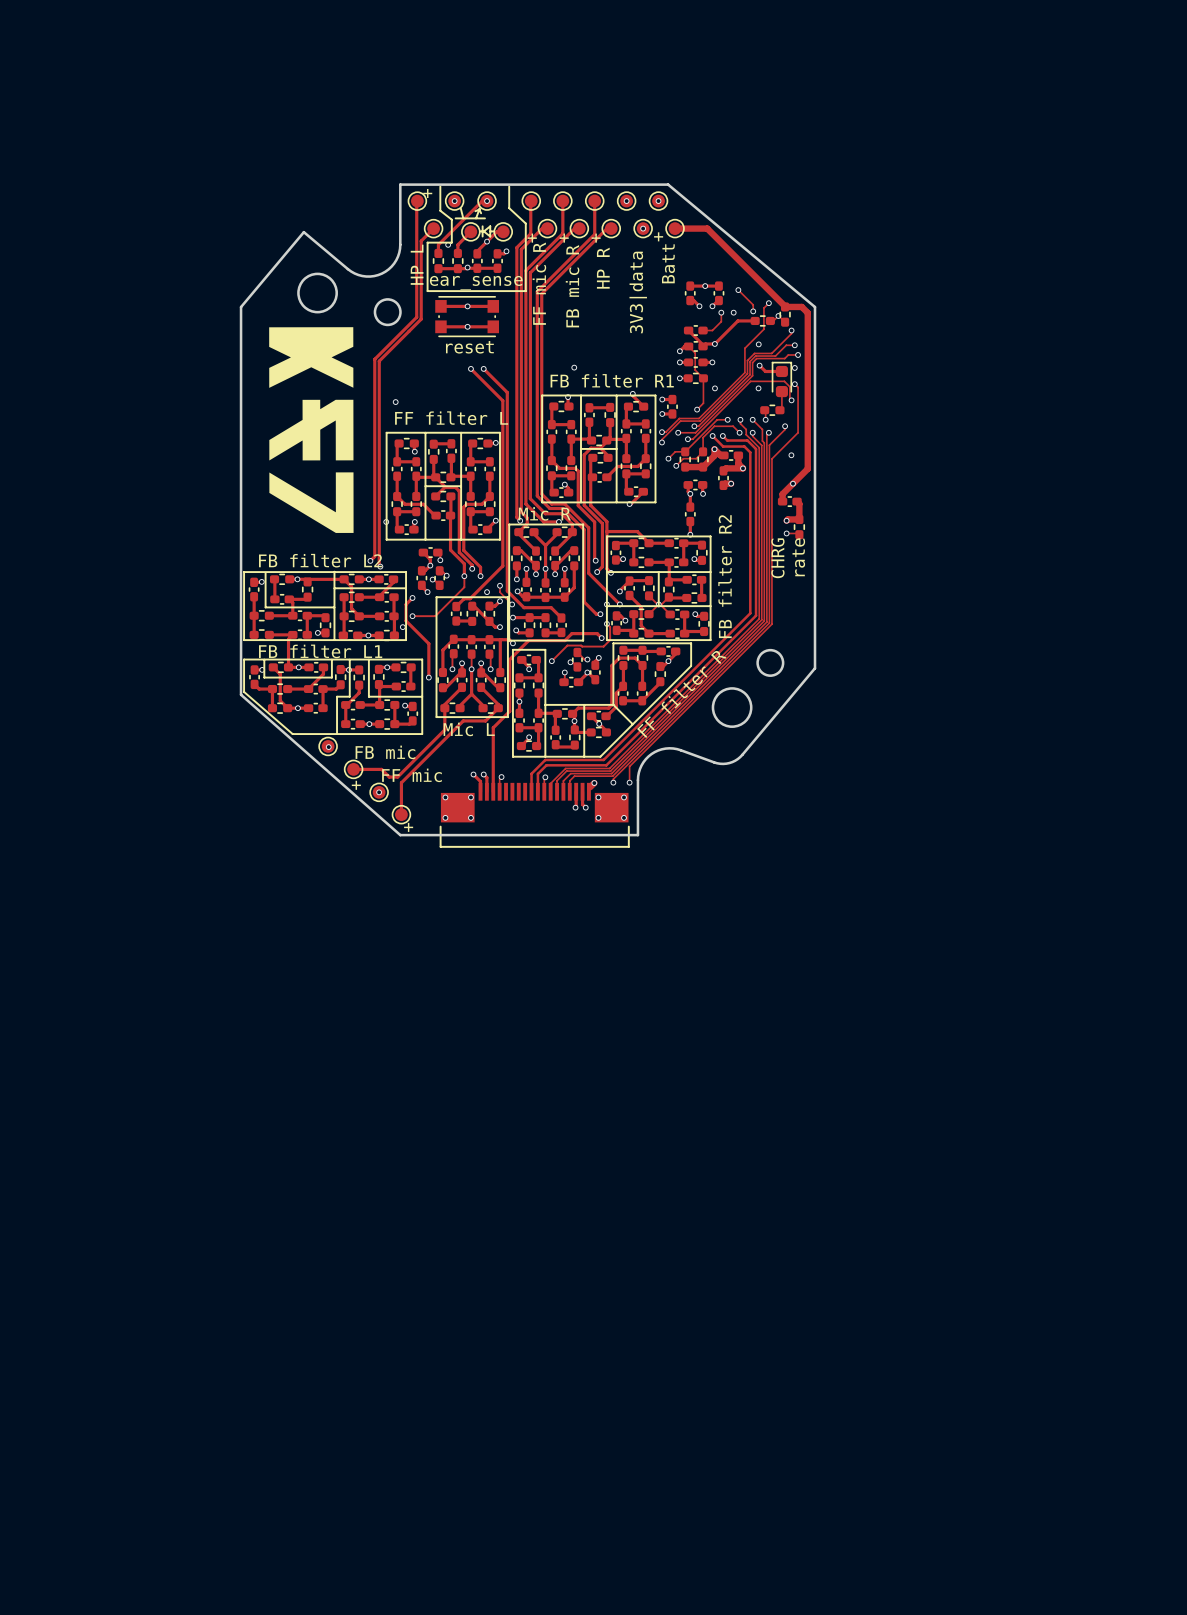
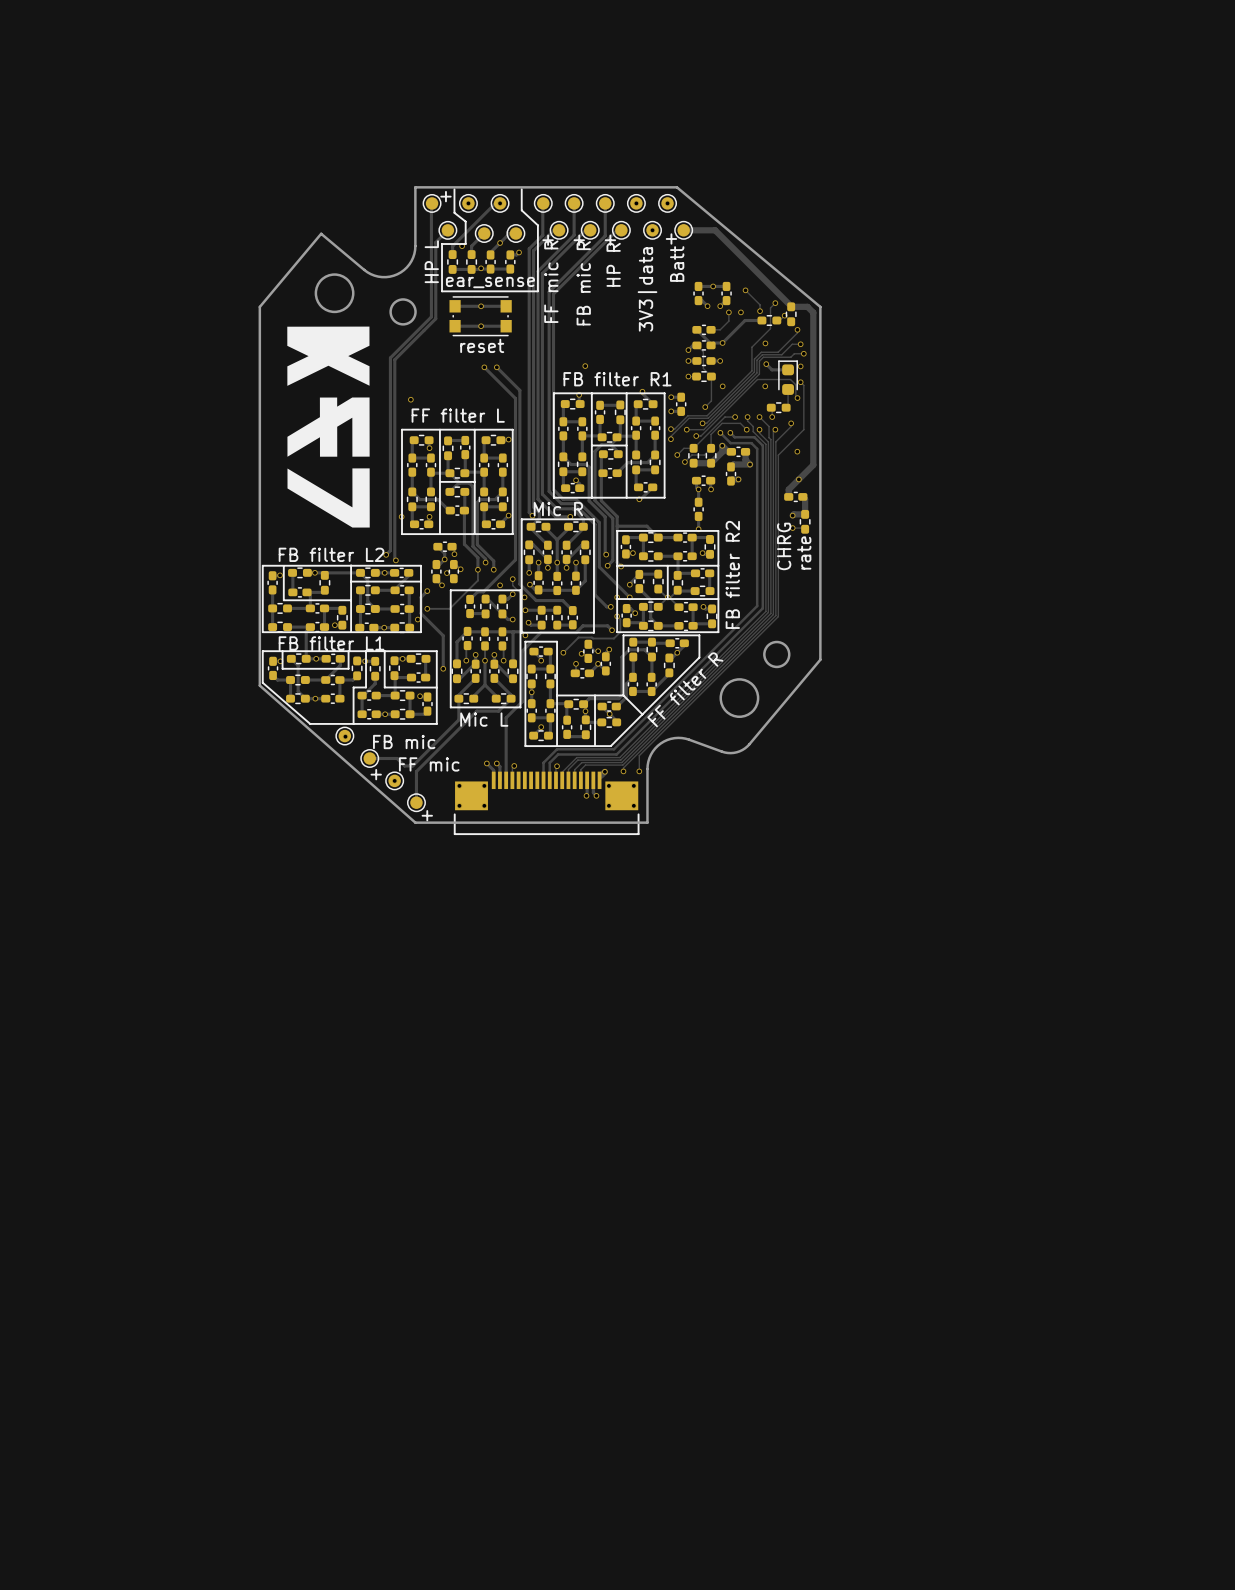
line: (460, 208) (463, 218) -> none
line: (479, 208) (476, 218) -> none
line: (475, 211) (479, 209) (481, 213) -> none
line: (455, 218) (484, 218) -> none
line: (482, 226) (482, 236) -> none
line: (490, 226) (490, 236) (483, 231) (490, 226) -> none
line: (479, 231) (482, 231) -> none
line: (490, 231) (494, 231) -> none

